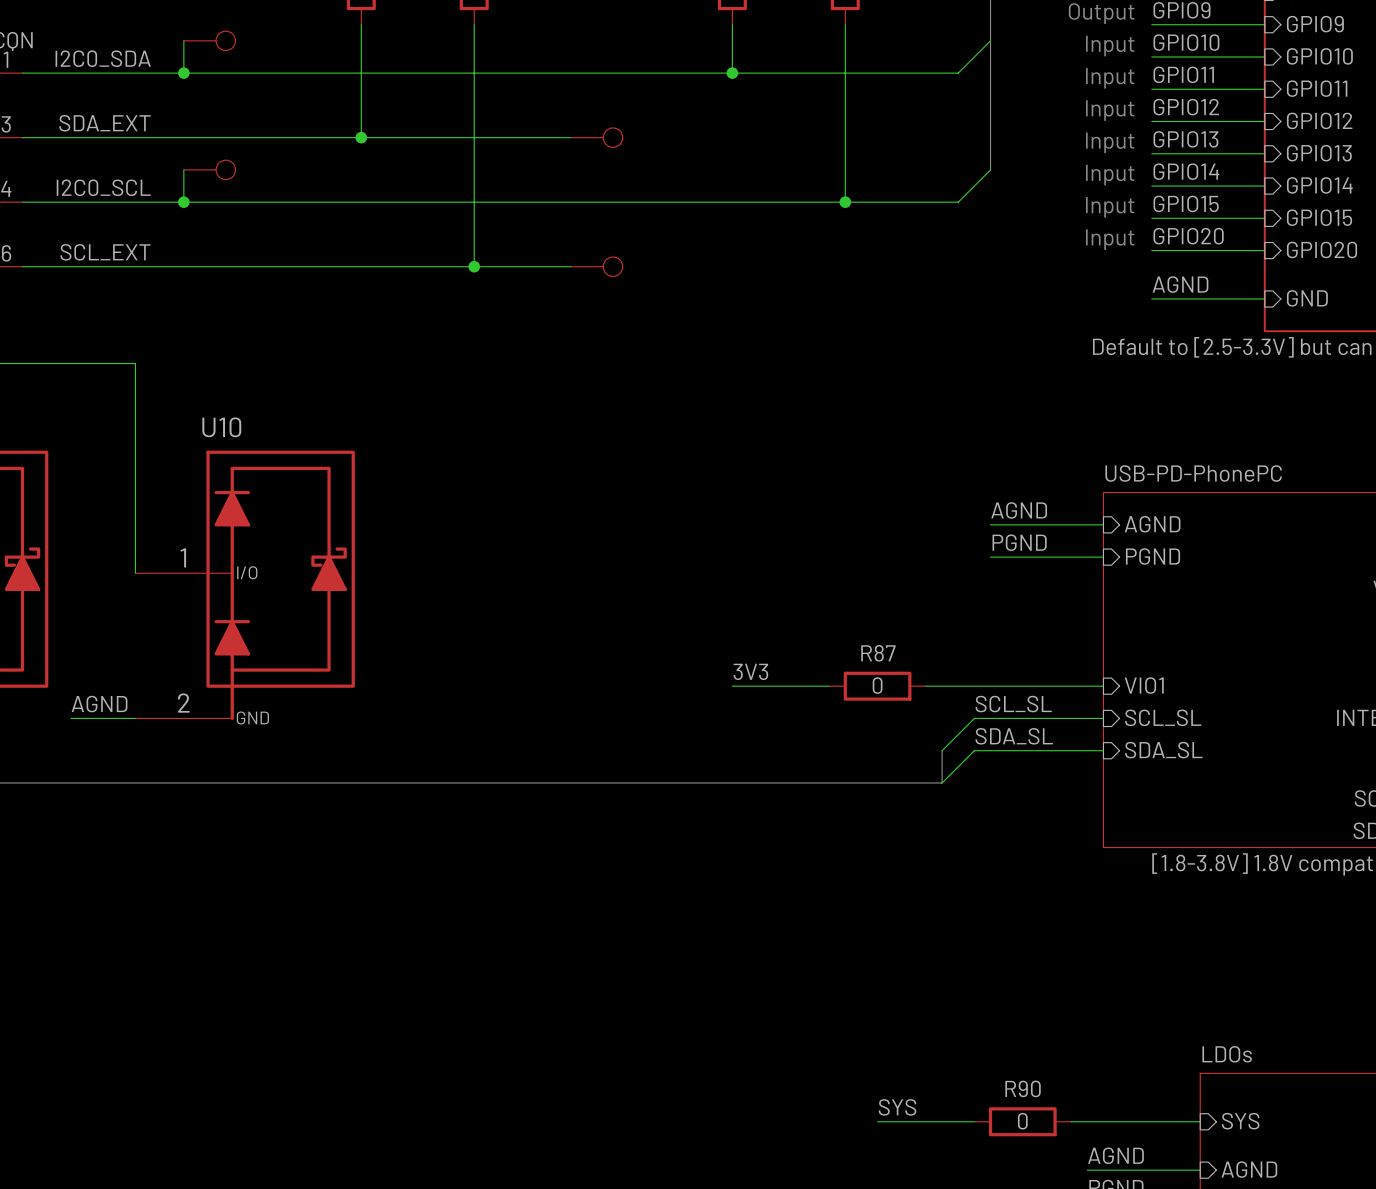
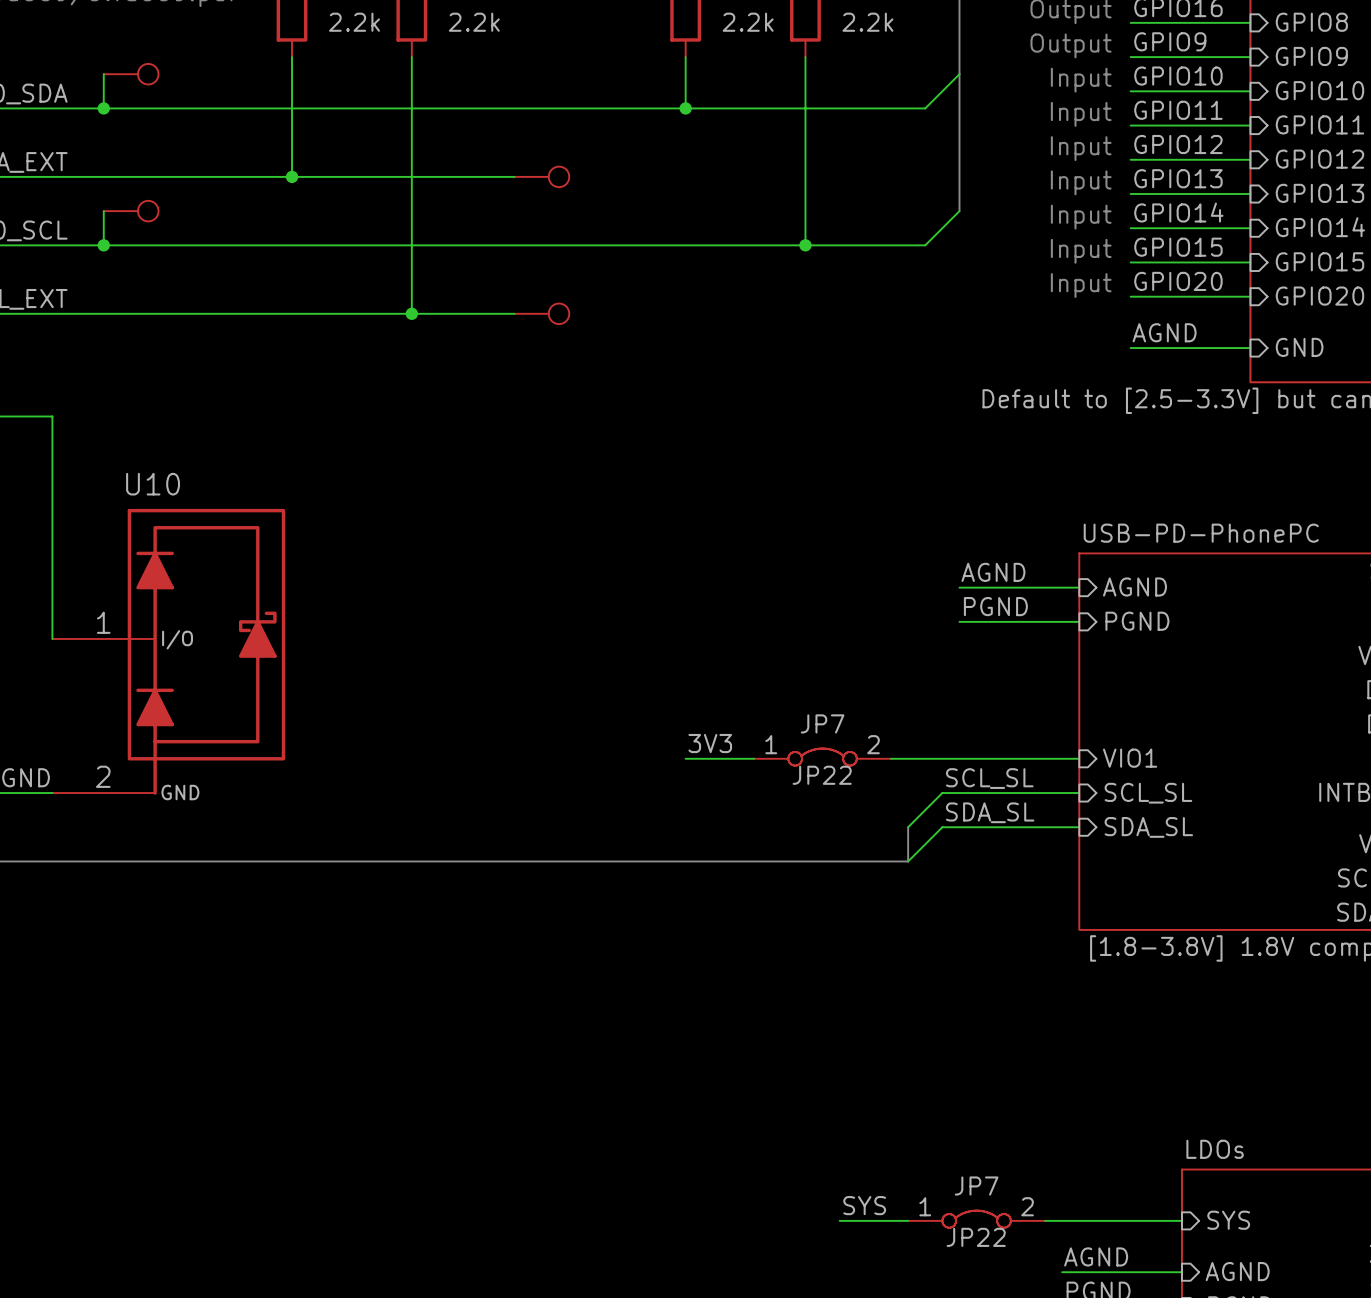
JP7: none -> (822, 757)
JP22: none -> (822, 757)
R87: 0 (877, 686) -> none
JP22: none -> (976, 1219)
JP7: none -> (976, 1219)
R90: 0 (1022, 1121) -> none

